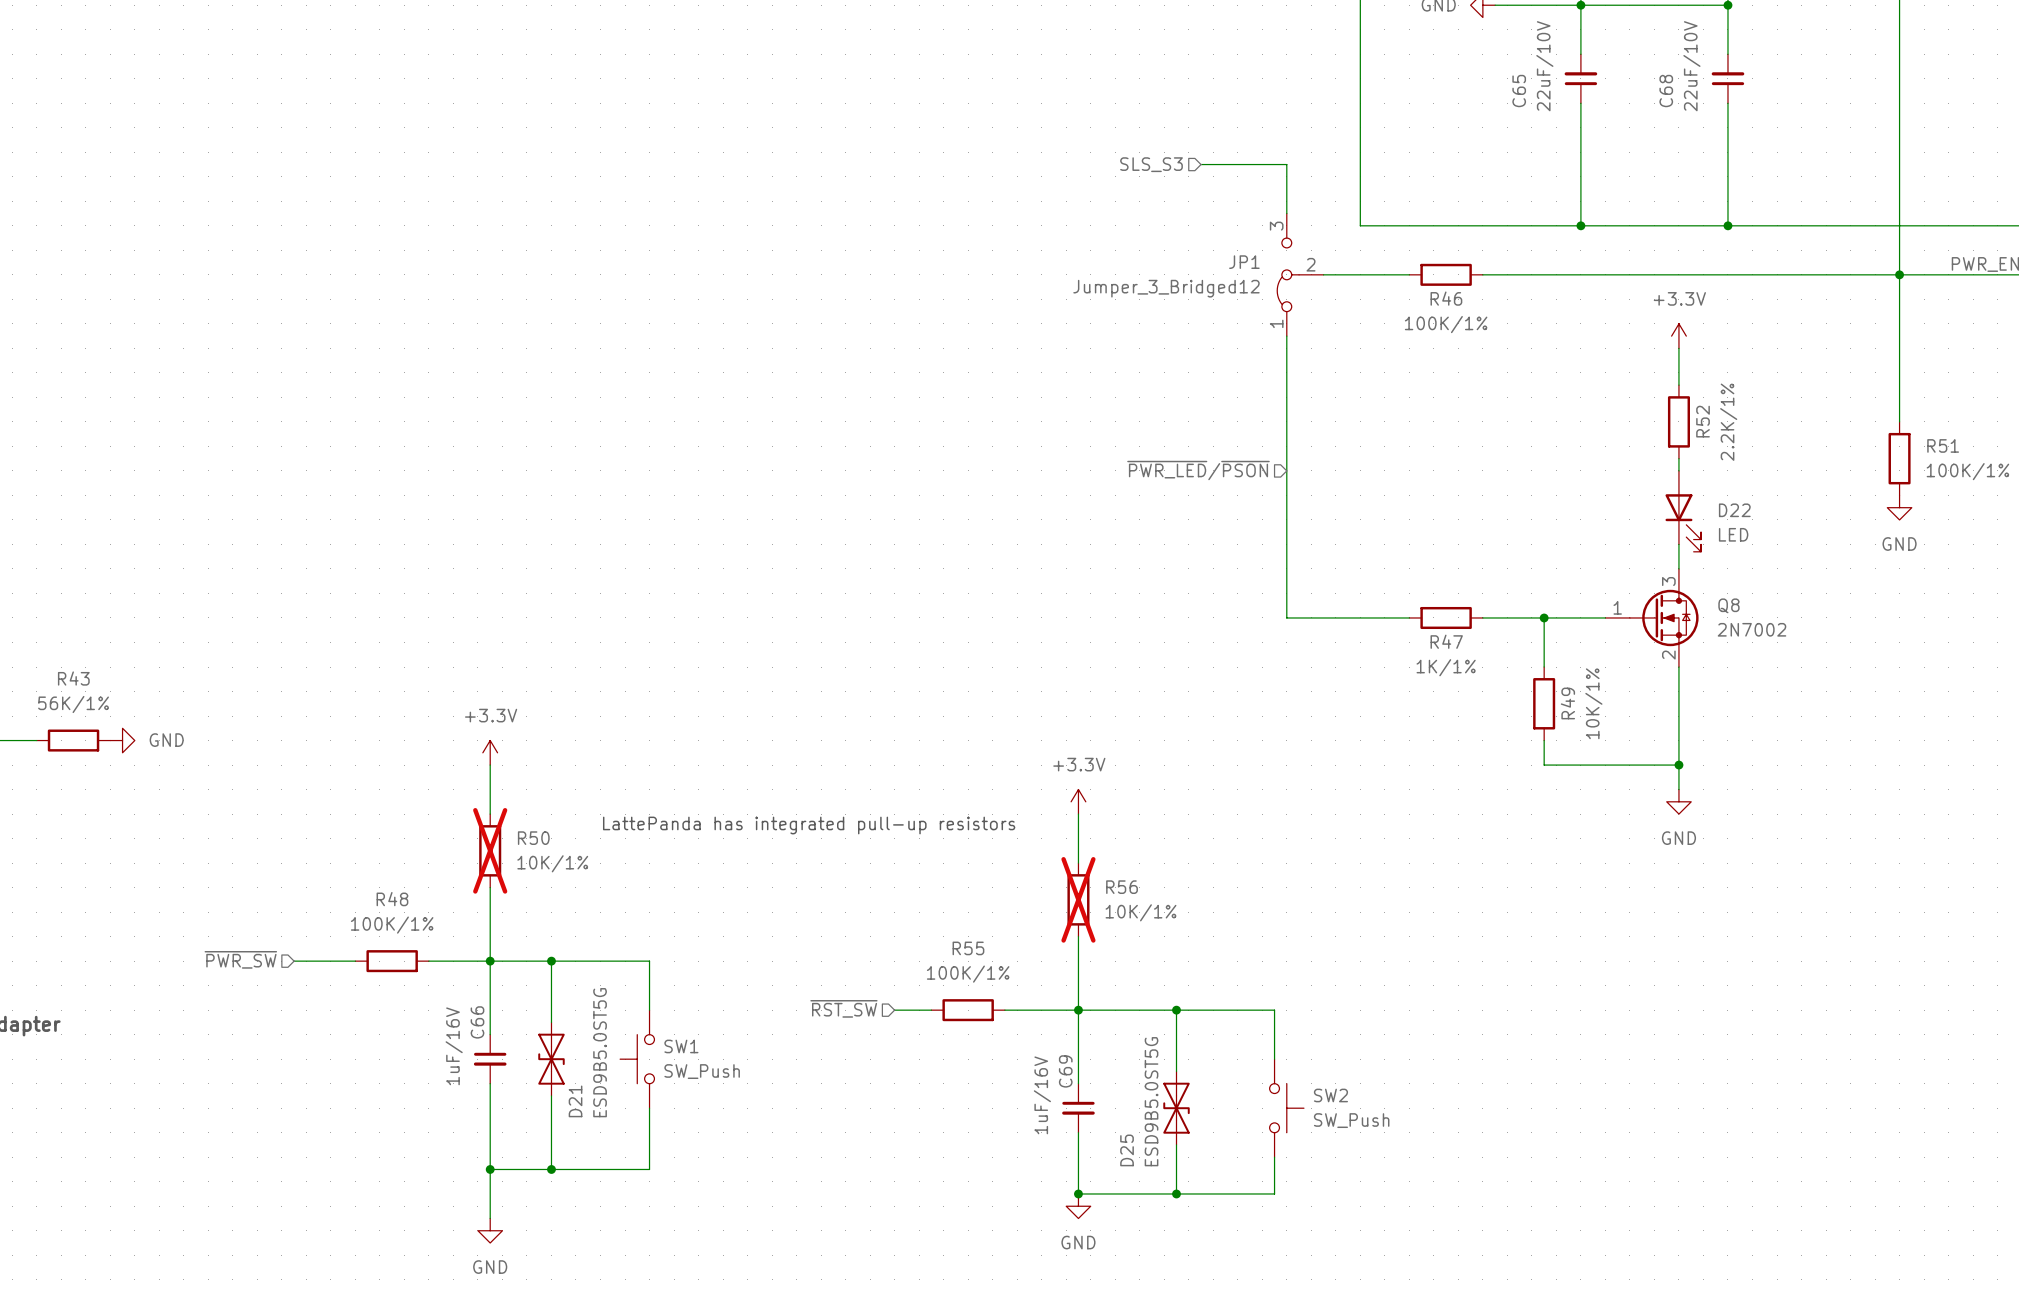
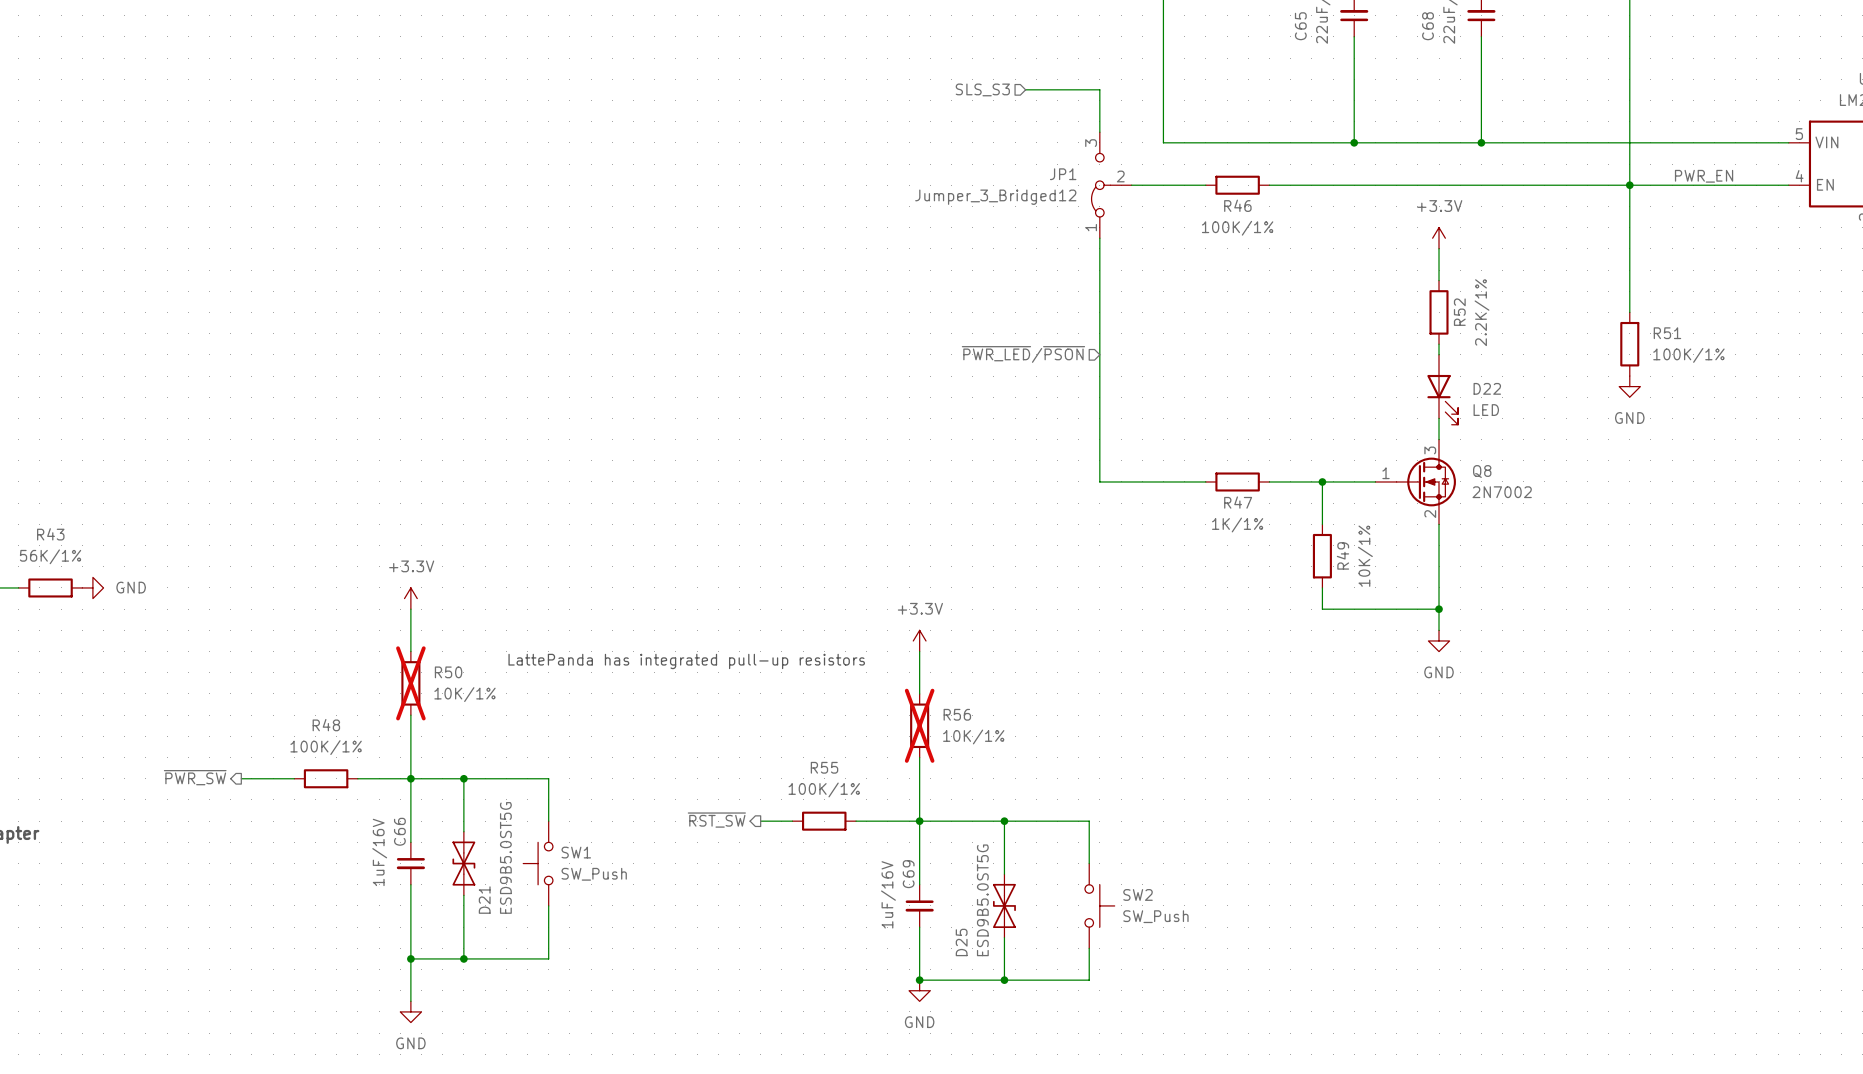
hierarchical label shape: input (240, 959) -> output (195, 777)
hierarchical label shape: input (843, 1008) -> output (716, 820)

